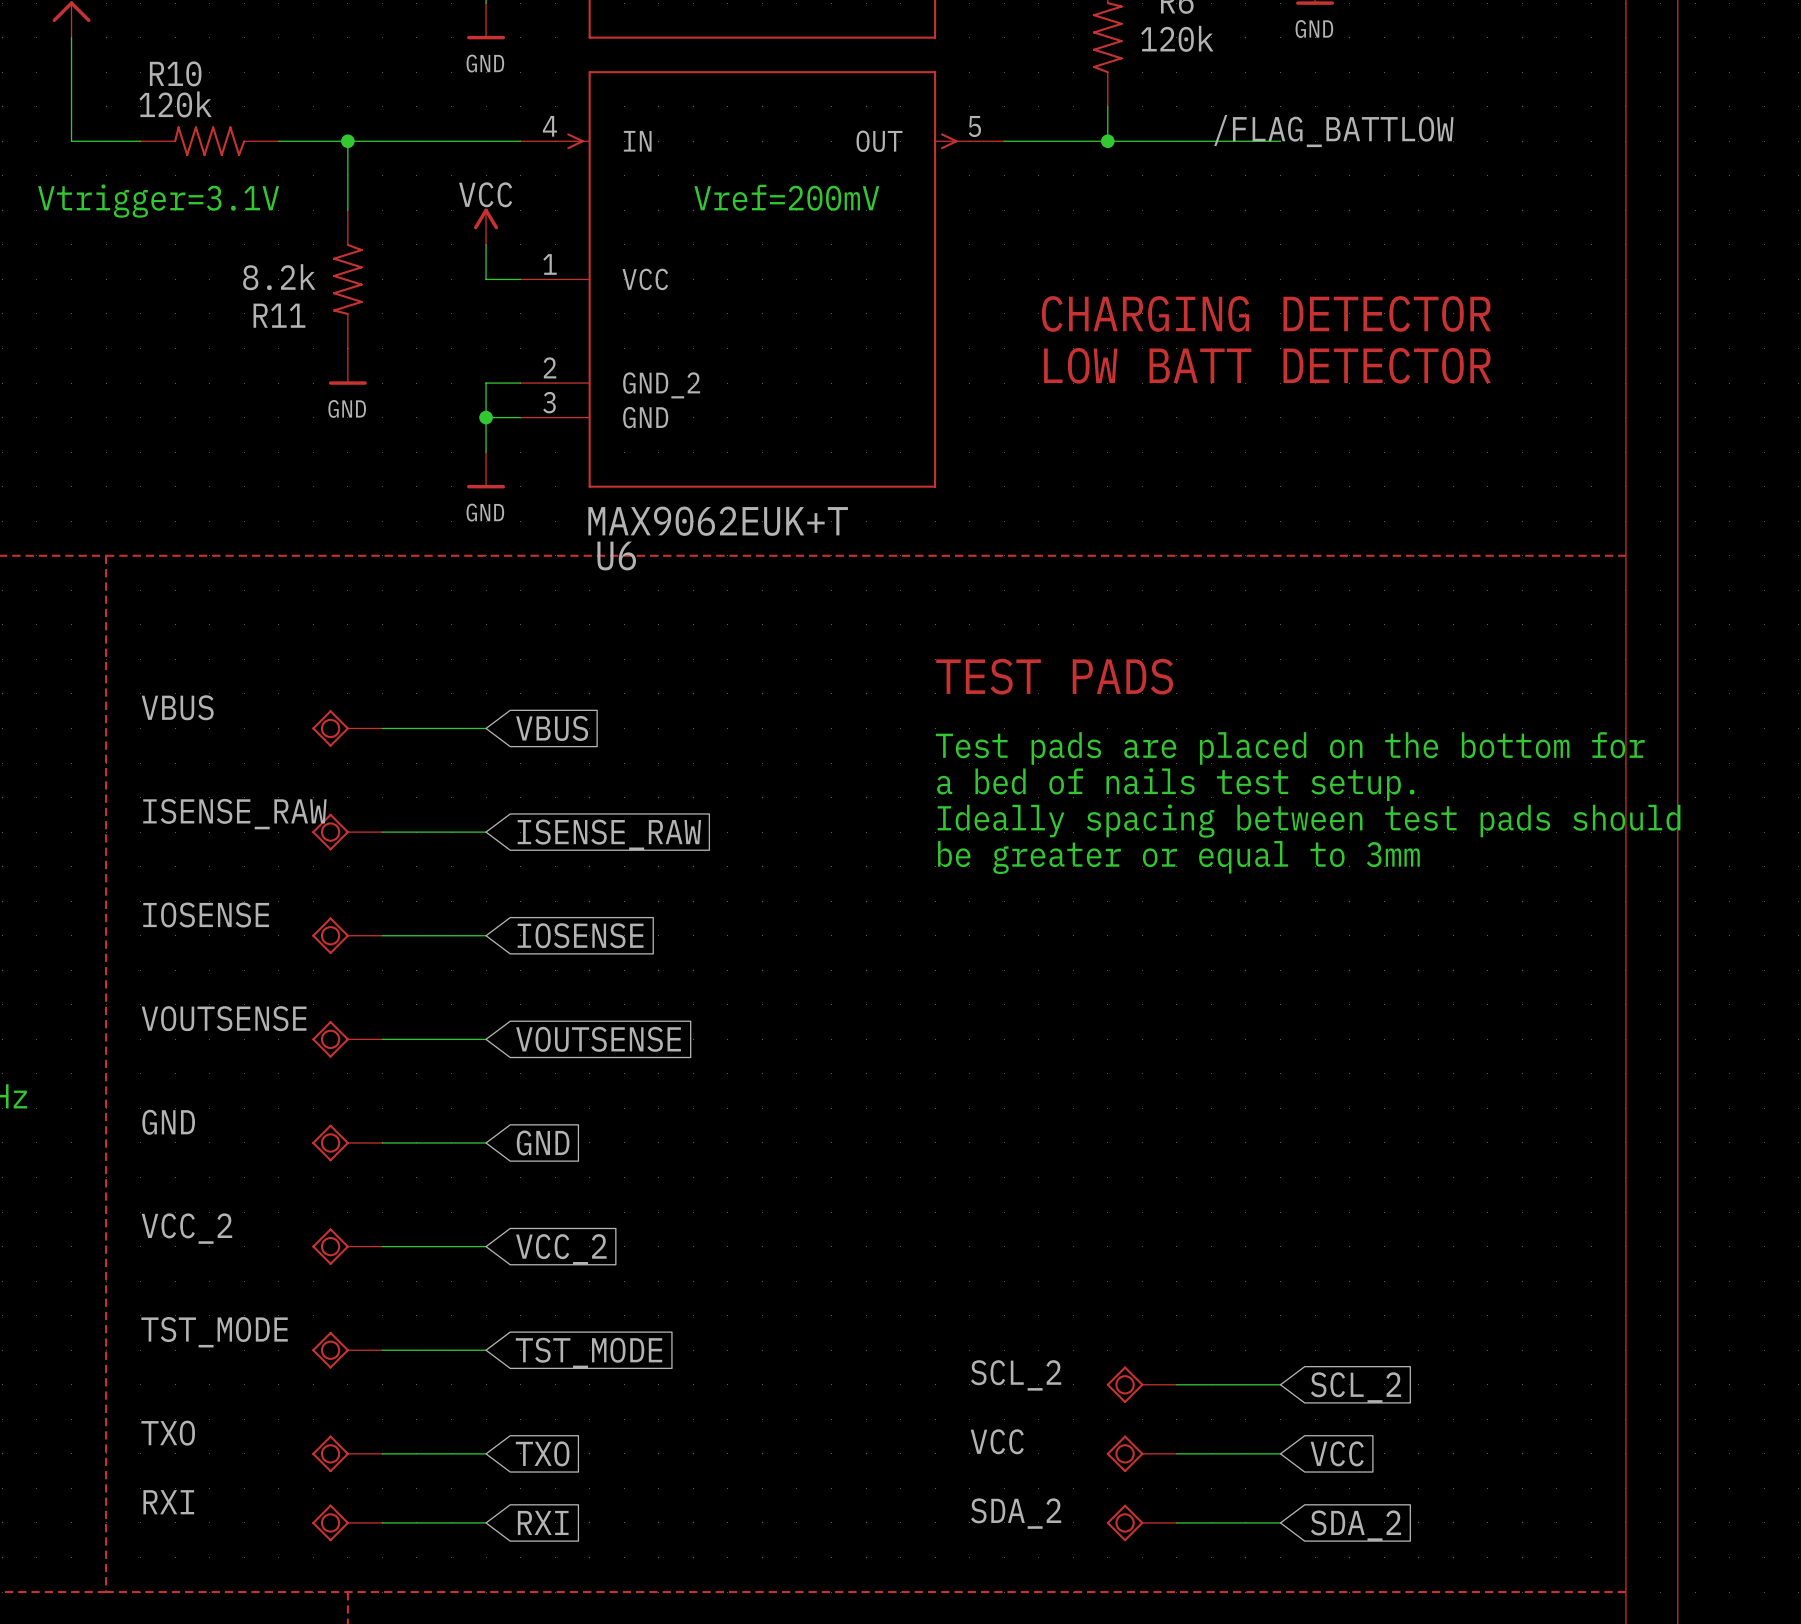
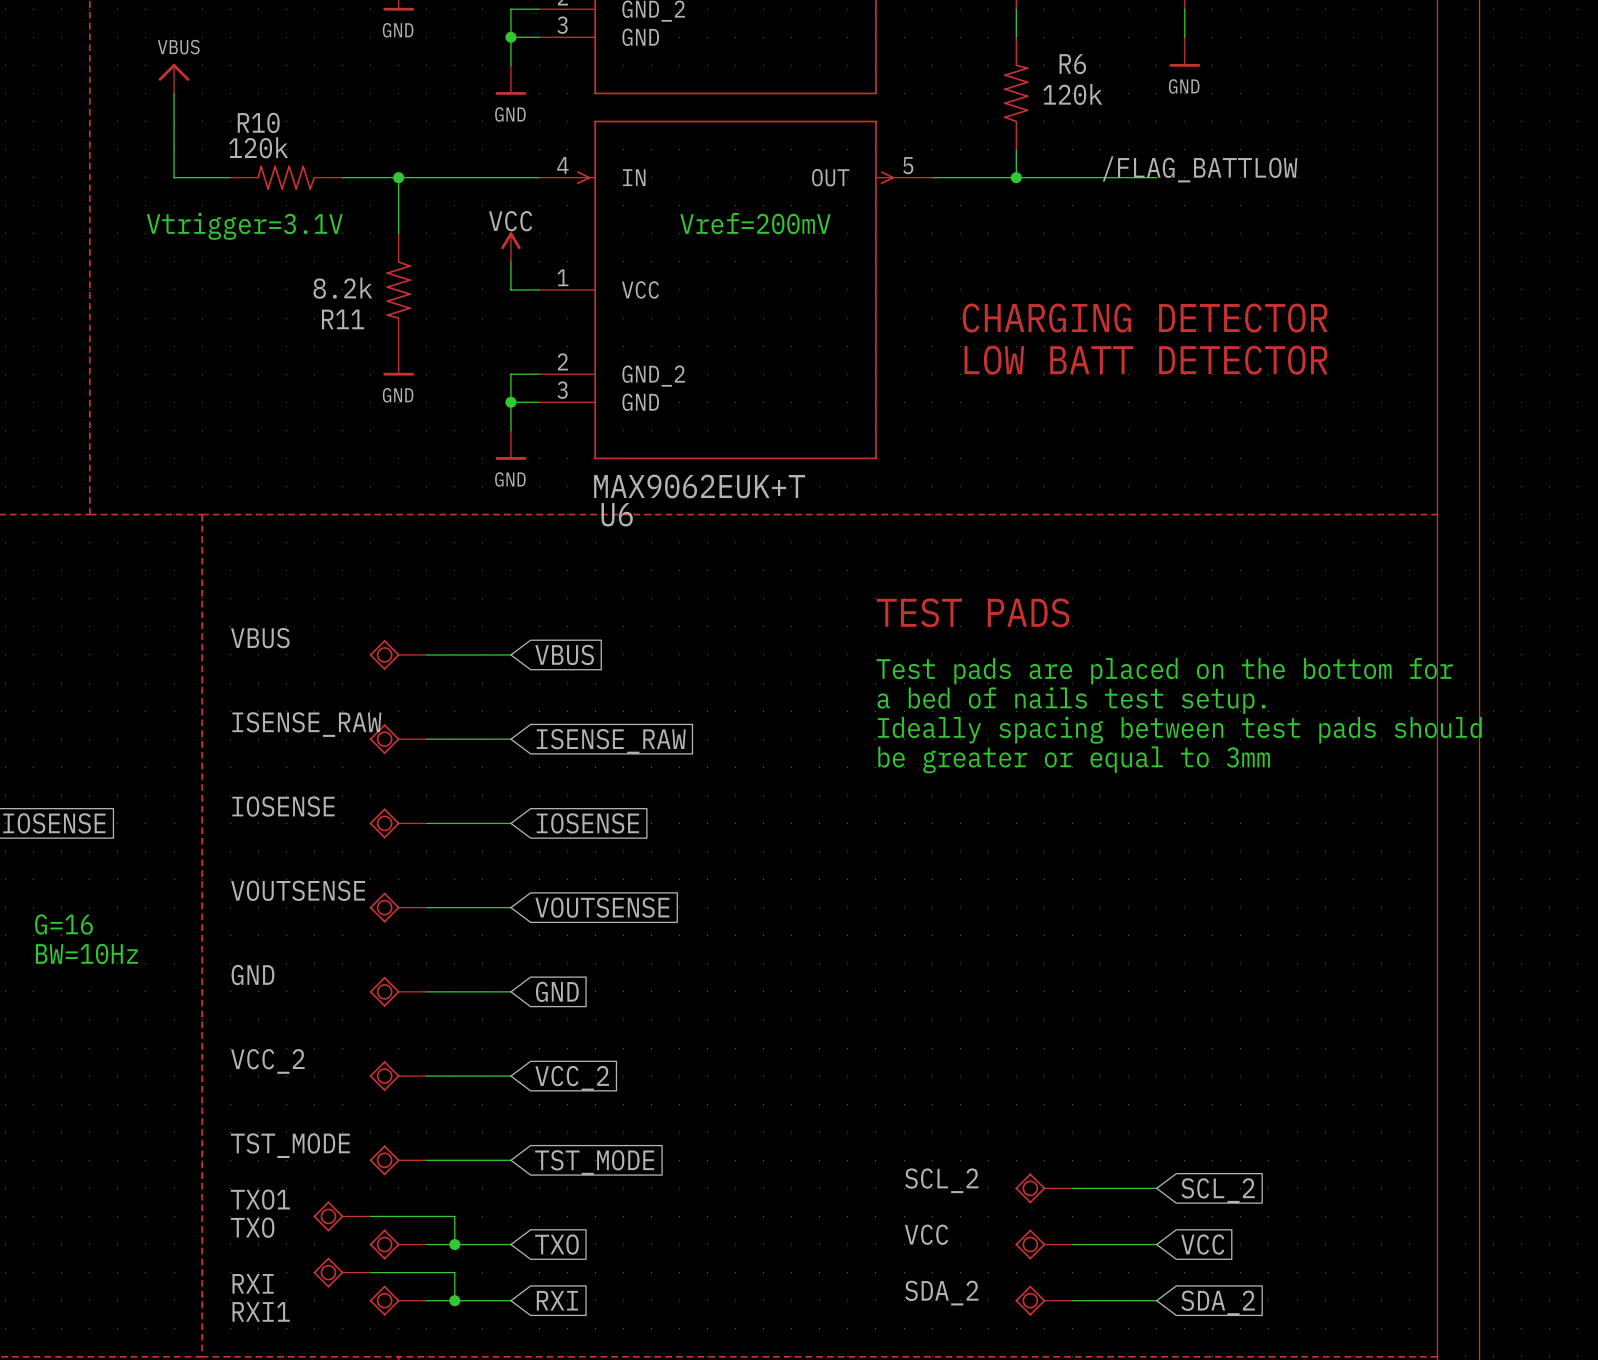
TXO1: none -> (342, 1216)
wire: none -> (370, 1216) (454, 1216) (454, 1244)
junction: none -> (454, 1244)
RXI1: none -> (342, 1272)
wire: none -> (370, 1272) (454, 1272) (454, 1300)
junction: none -> (454, 1300)

